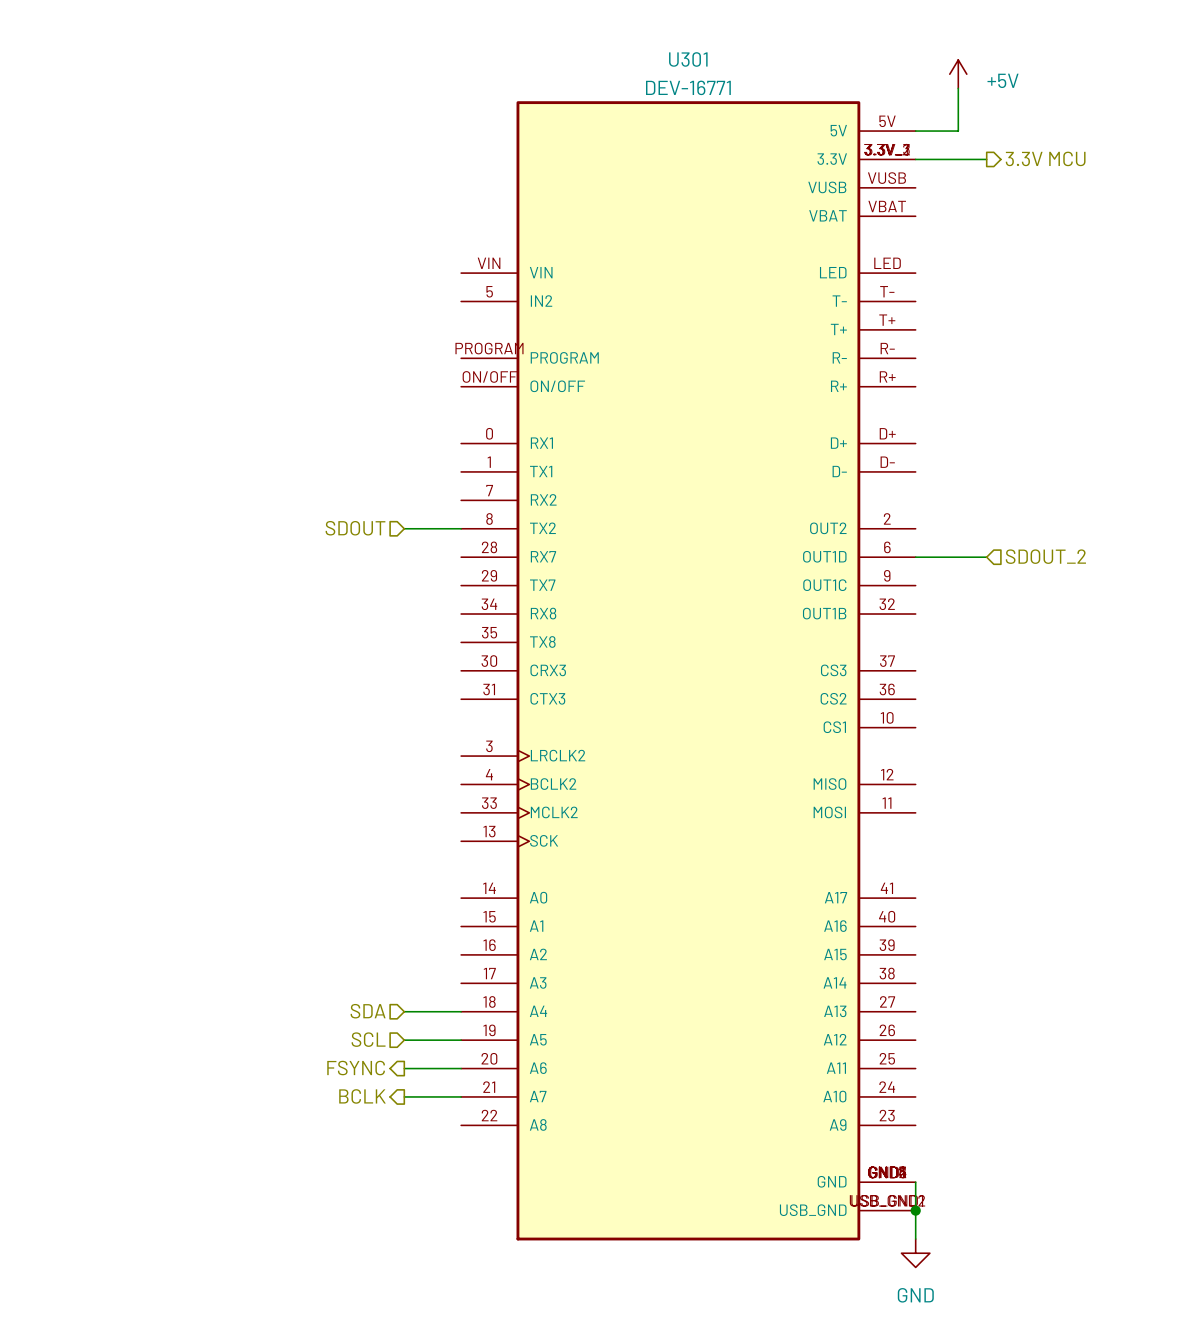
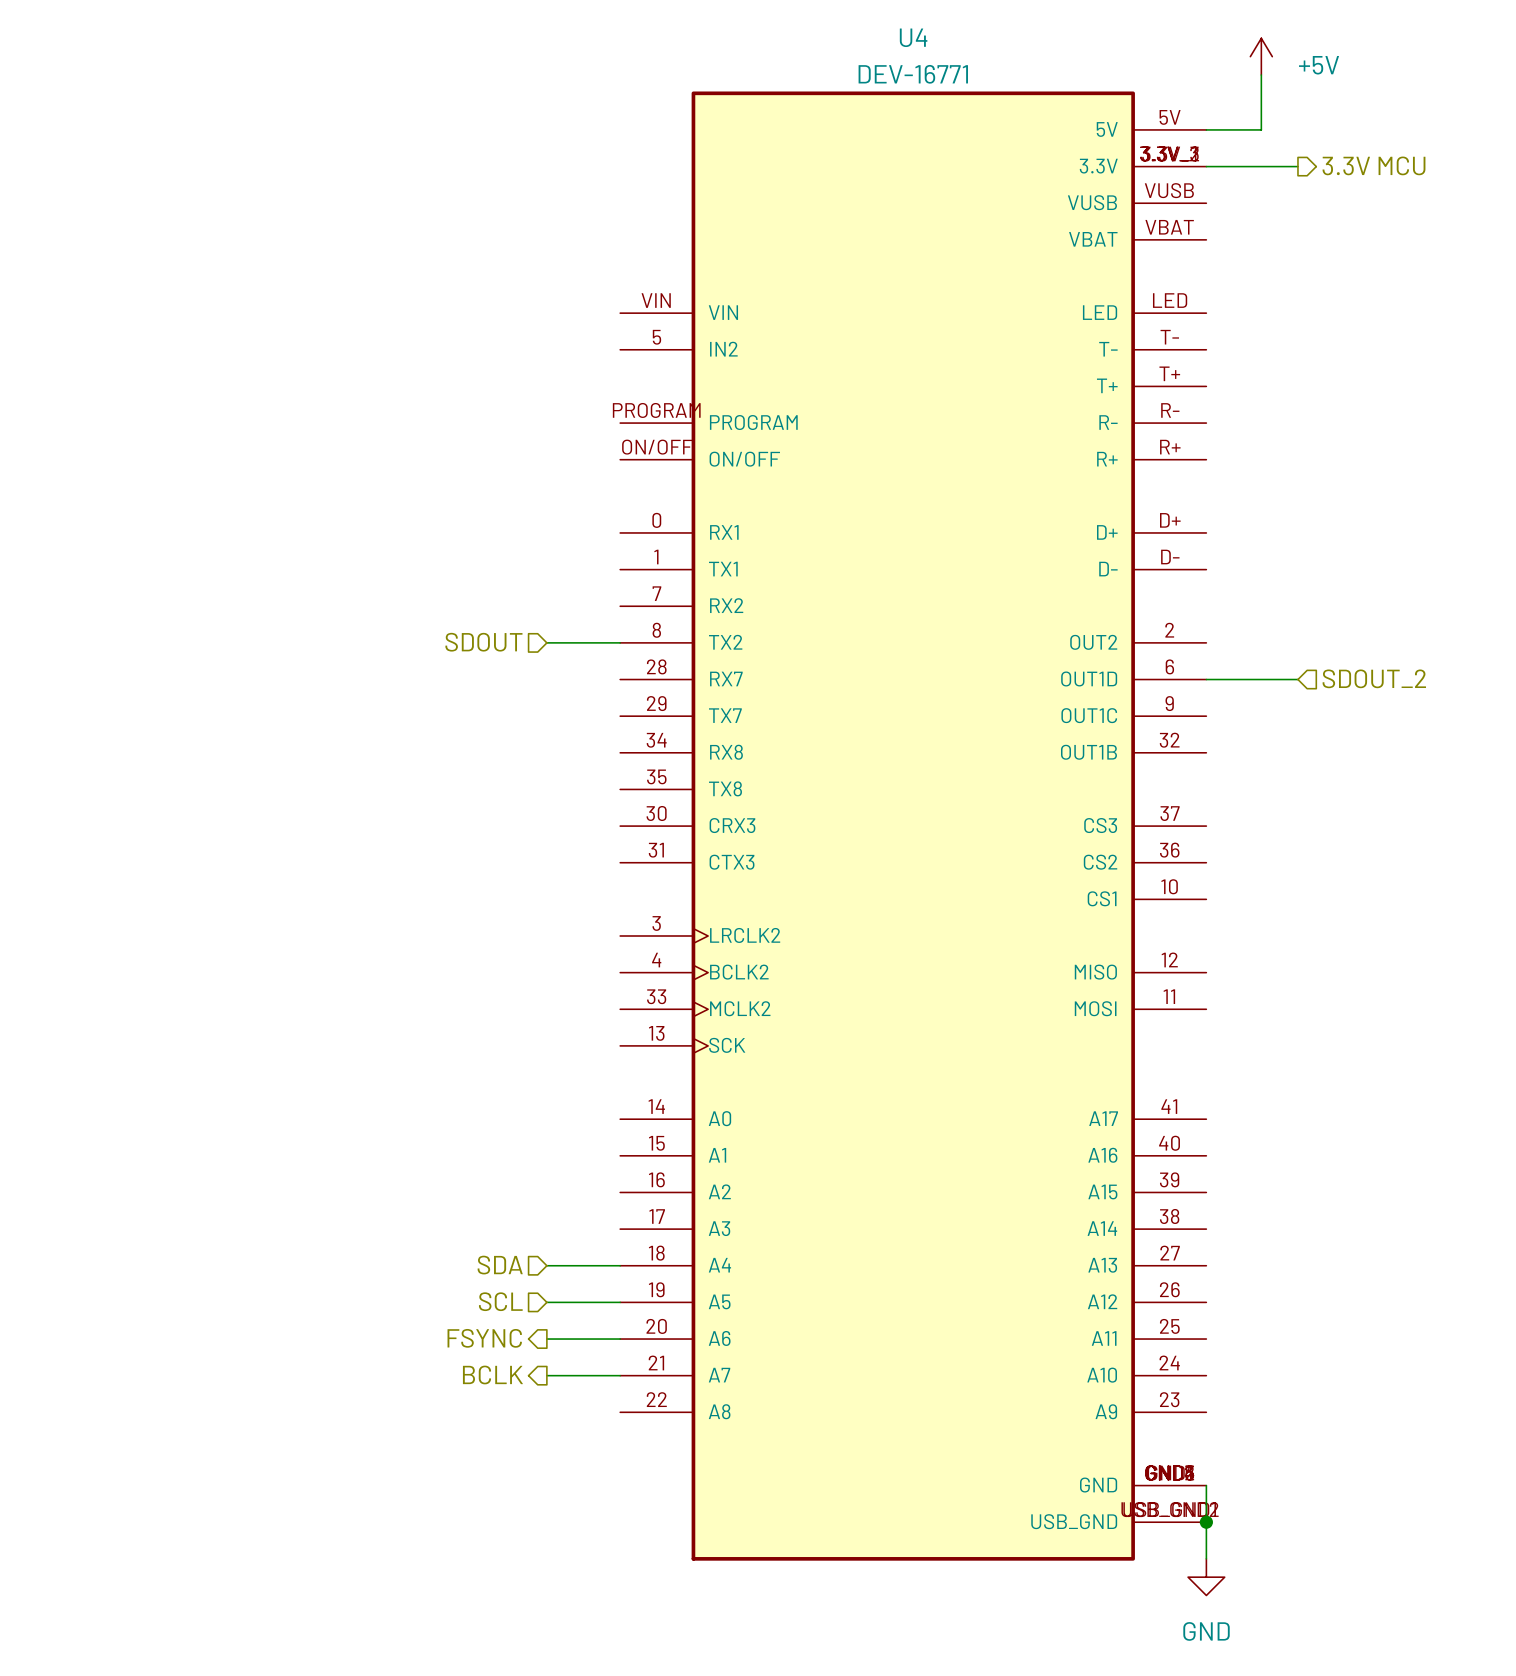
U301 name: U301 (688, 59) -> U4 (913, 37)

